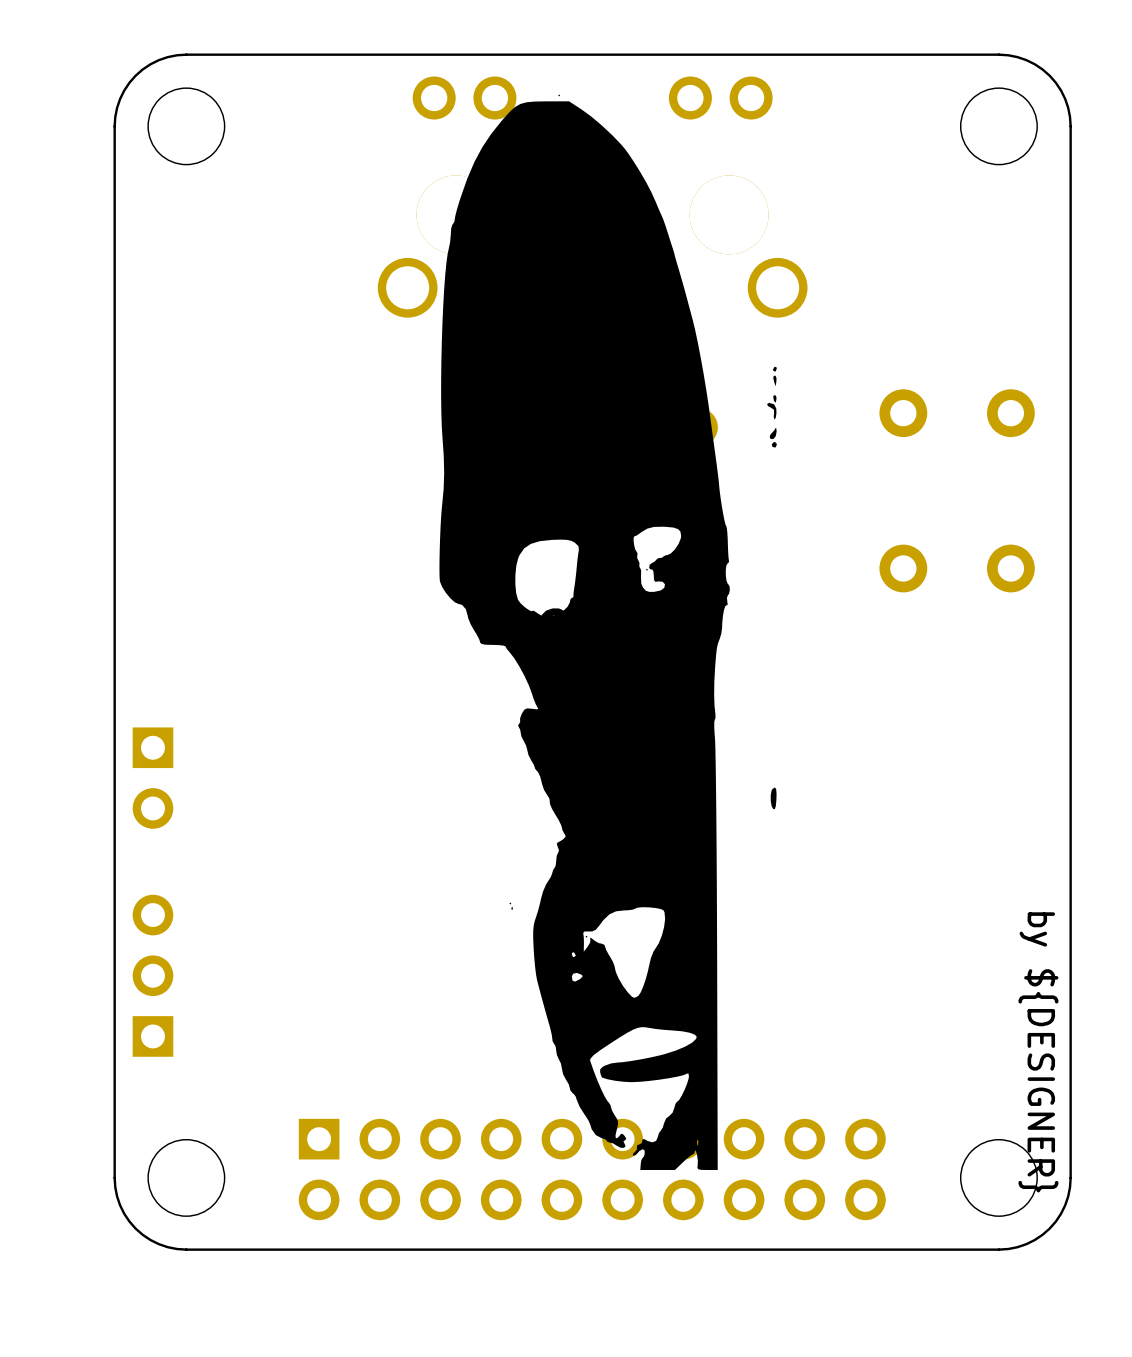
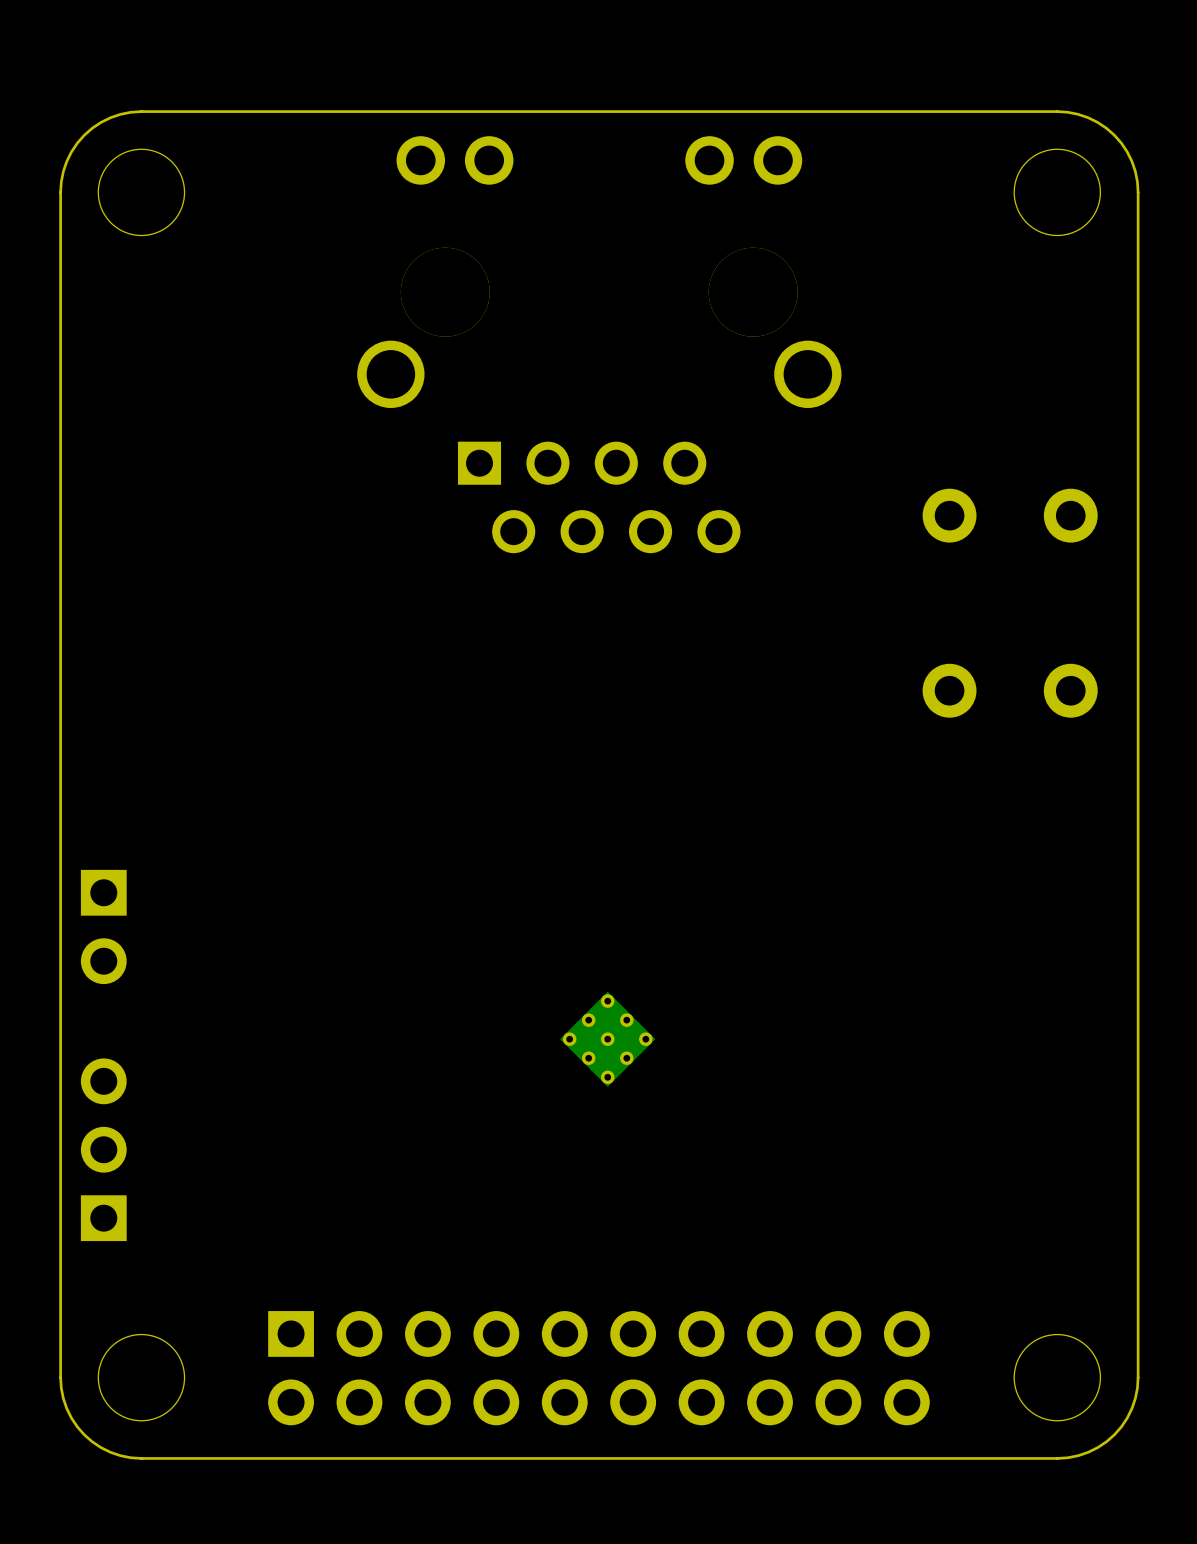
part: (608, 632) -> none
text: by ${DESIGNER} (1038, 1052) -> none

